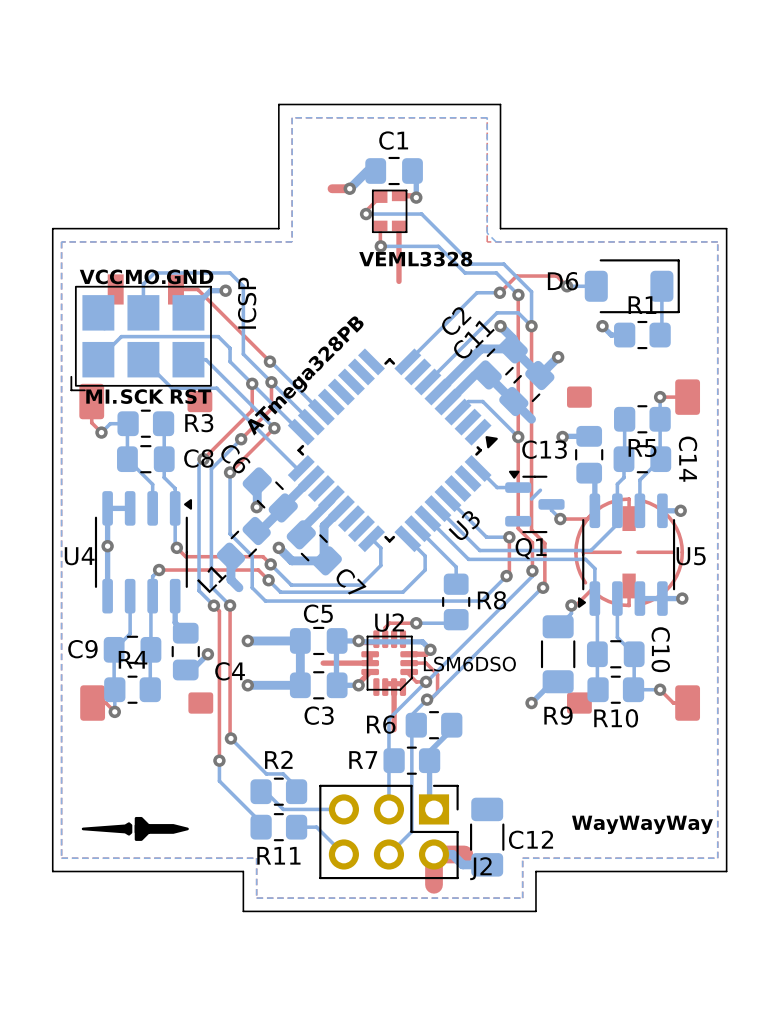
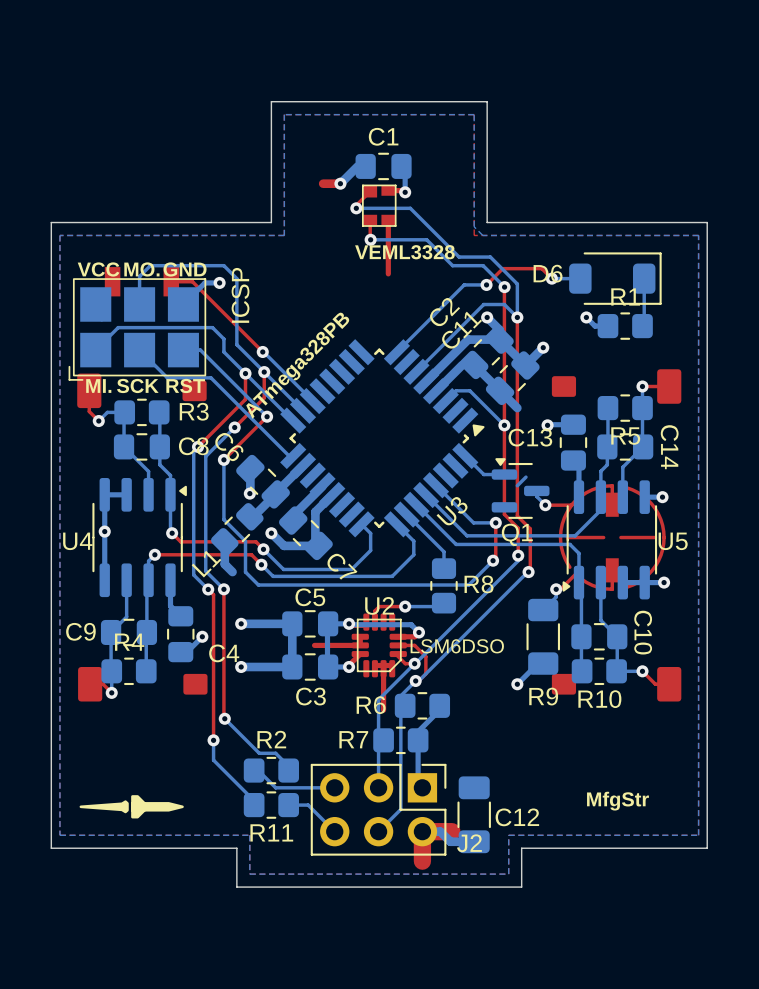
text: none -> MfgStr (617, 801)
text: WayWayWay (642, 824) -> none

